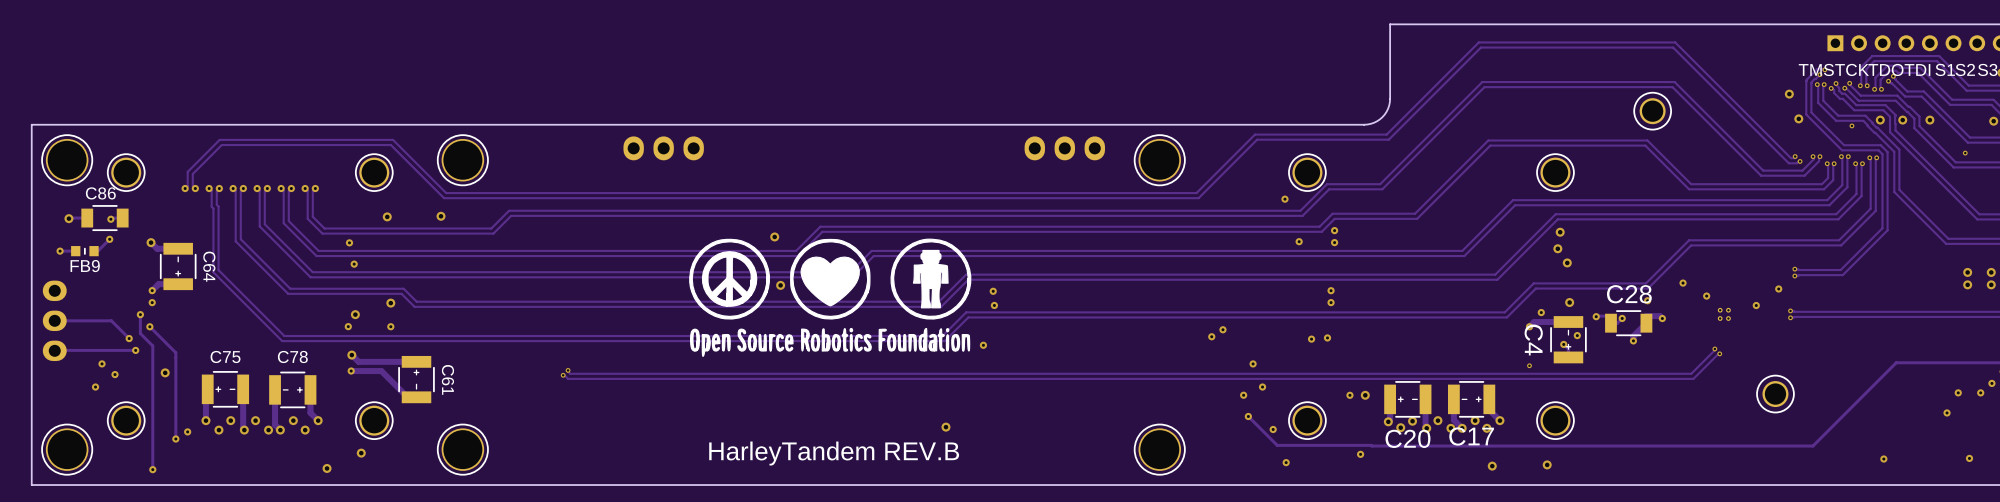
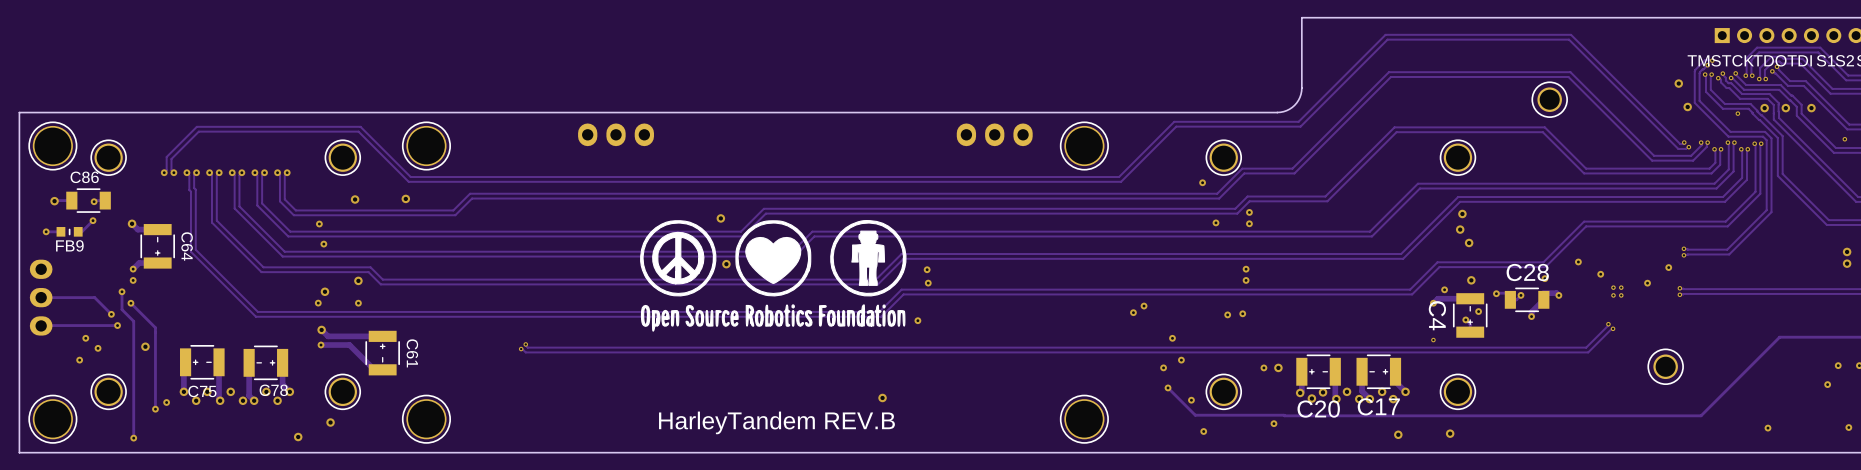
C75 name position: C75 (225, 356) -> C75 (202, 391)
C78 name position: C78 (292, 356) -> C78 (273, 390)

